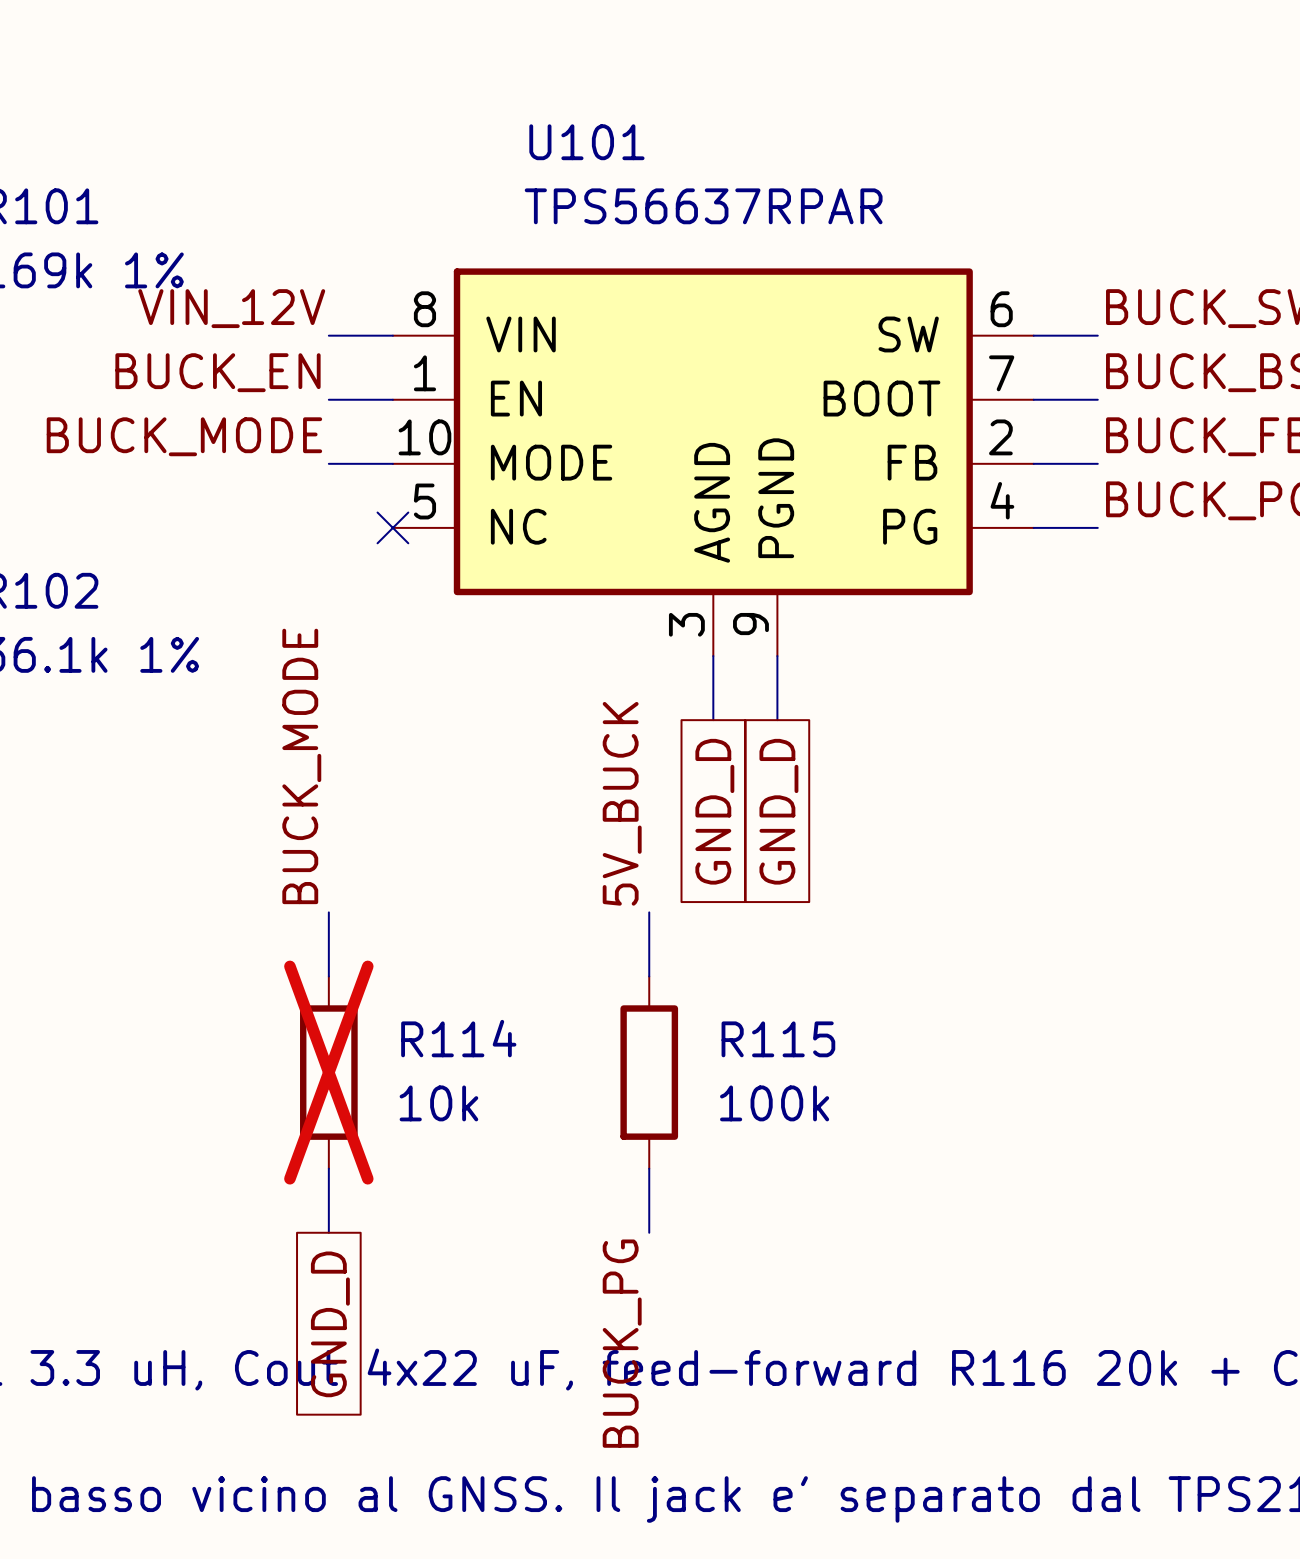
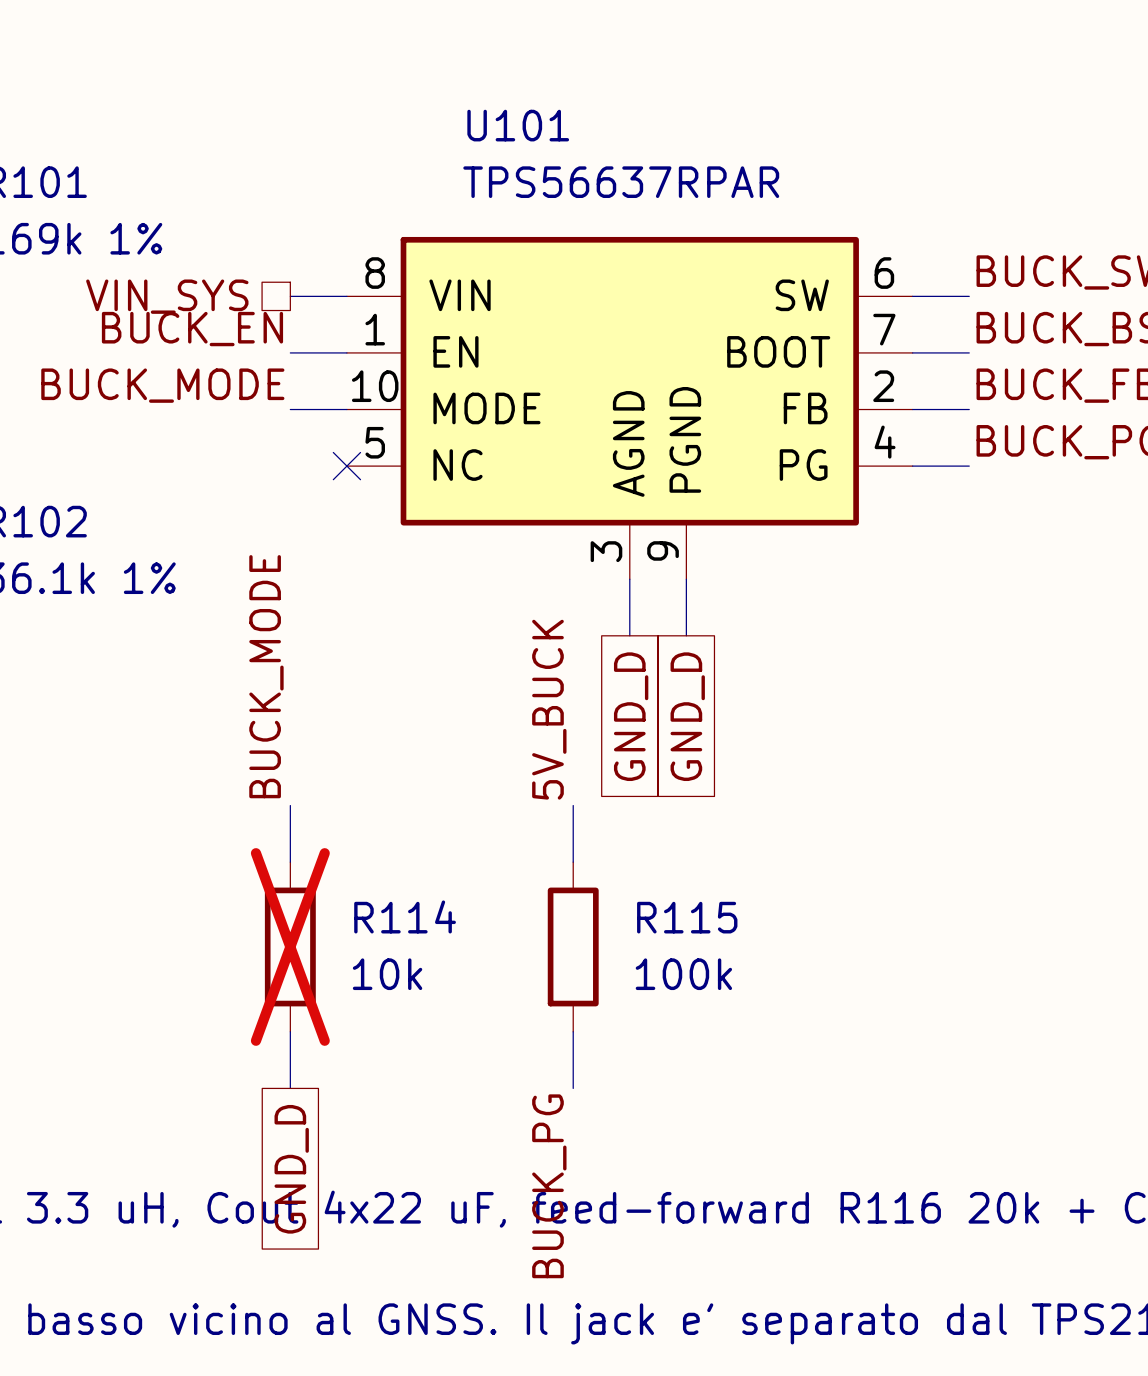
label: VIN_12V (231, 308) -> none
hierarchical label: none -> VIN_SYS (167, 296)

